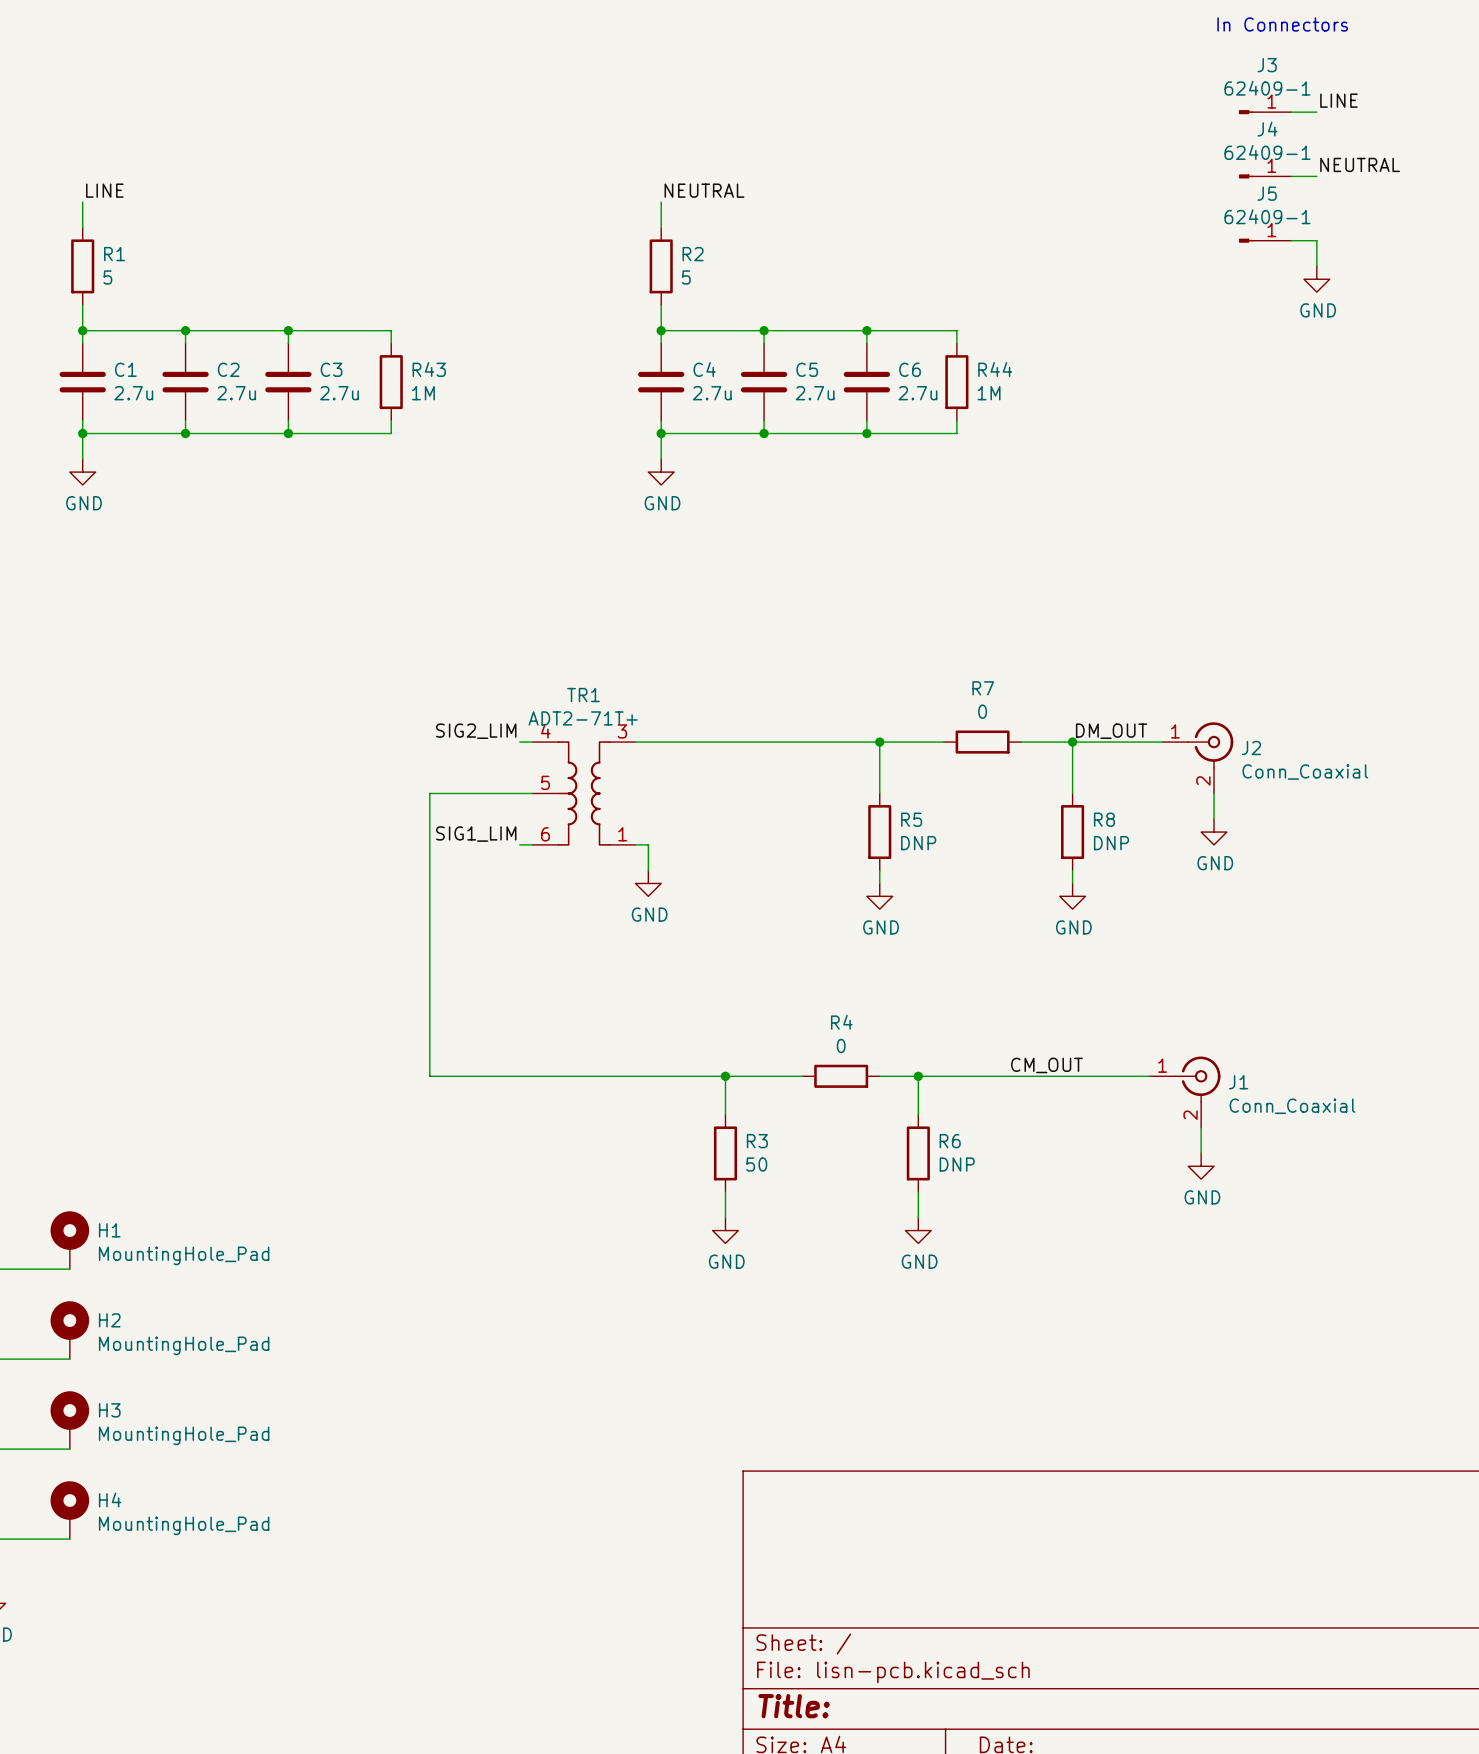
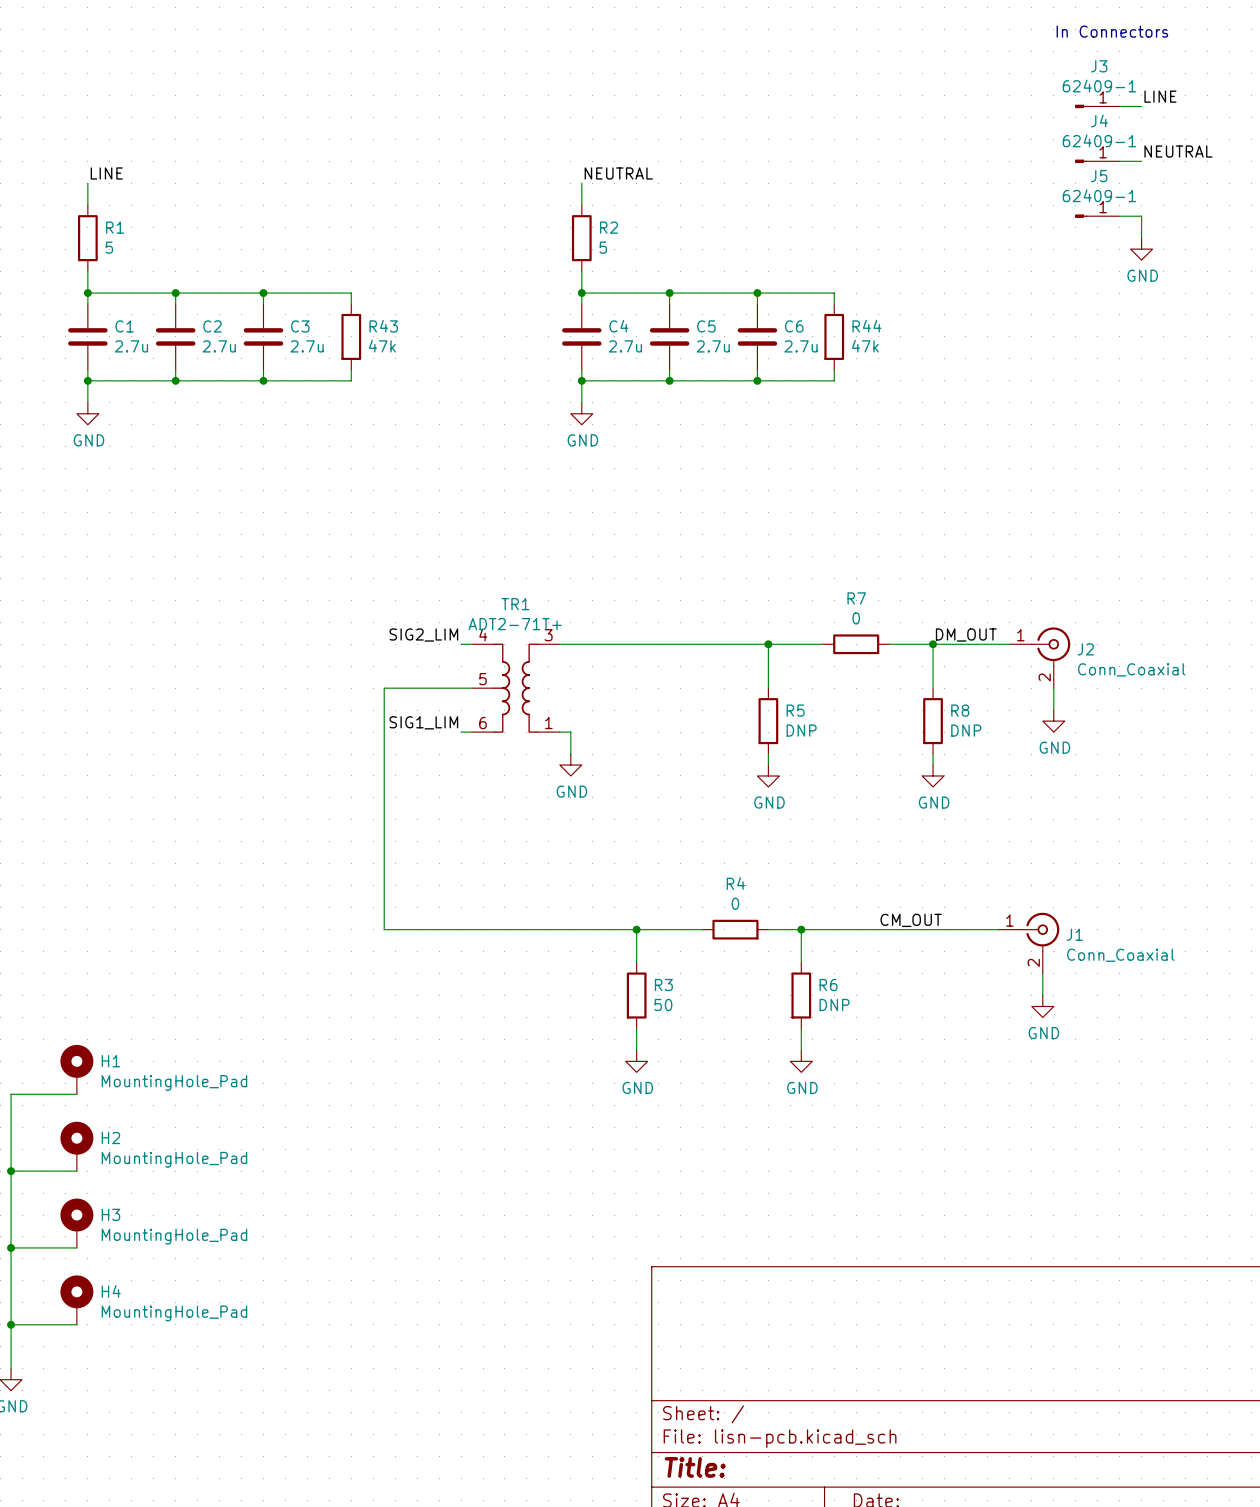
R43 value: 1M (423, 393) -> 47k (382, 346)
R44 value: 1M (989, 393) -> 47k (865, 346)

